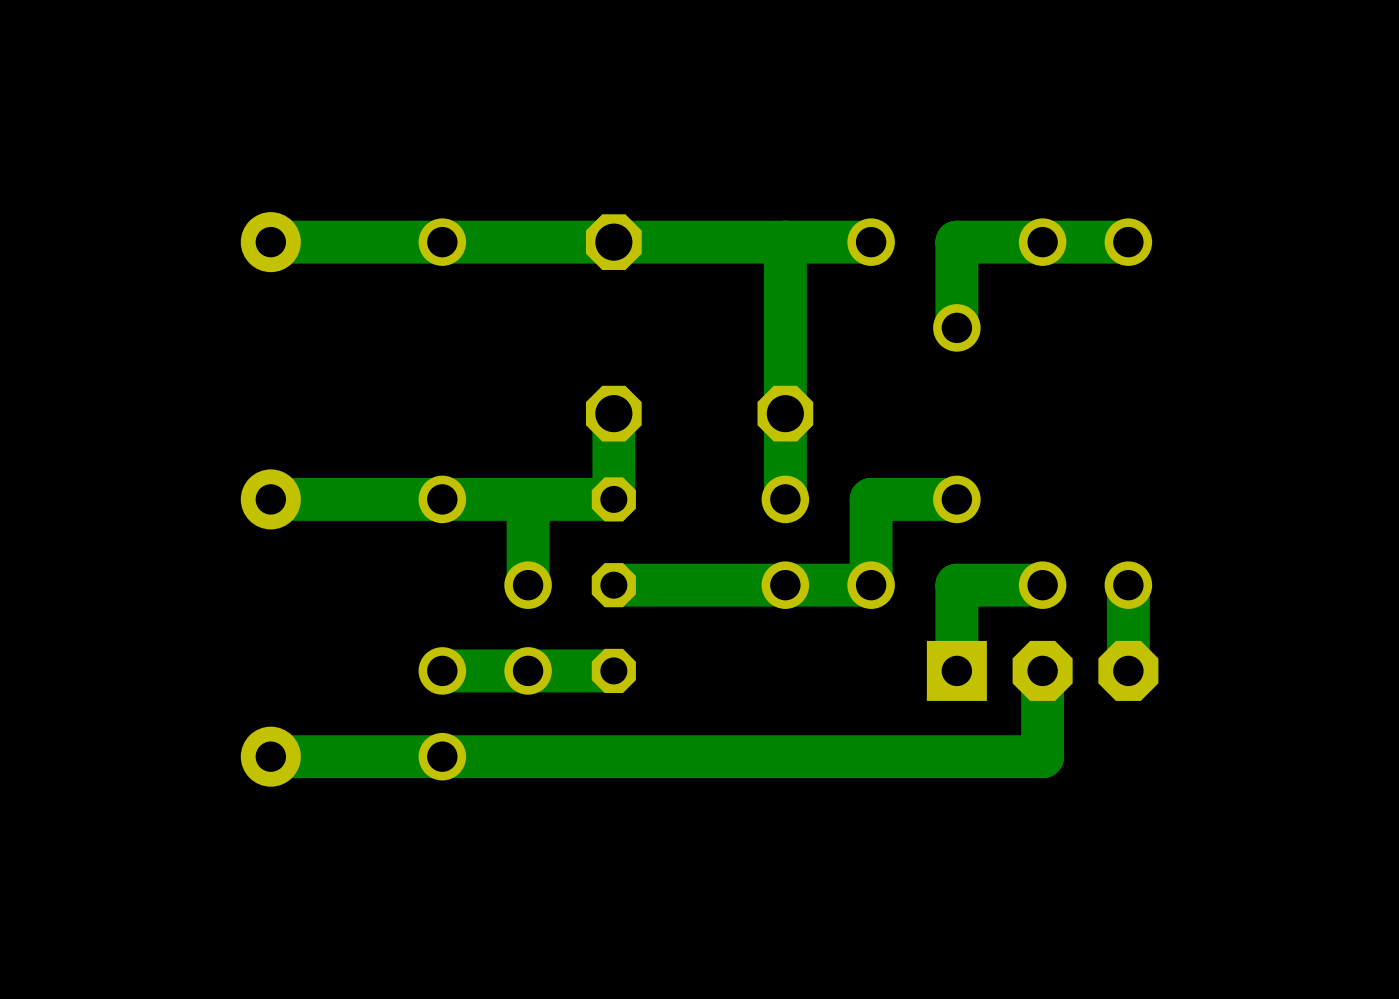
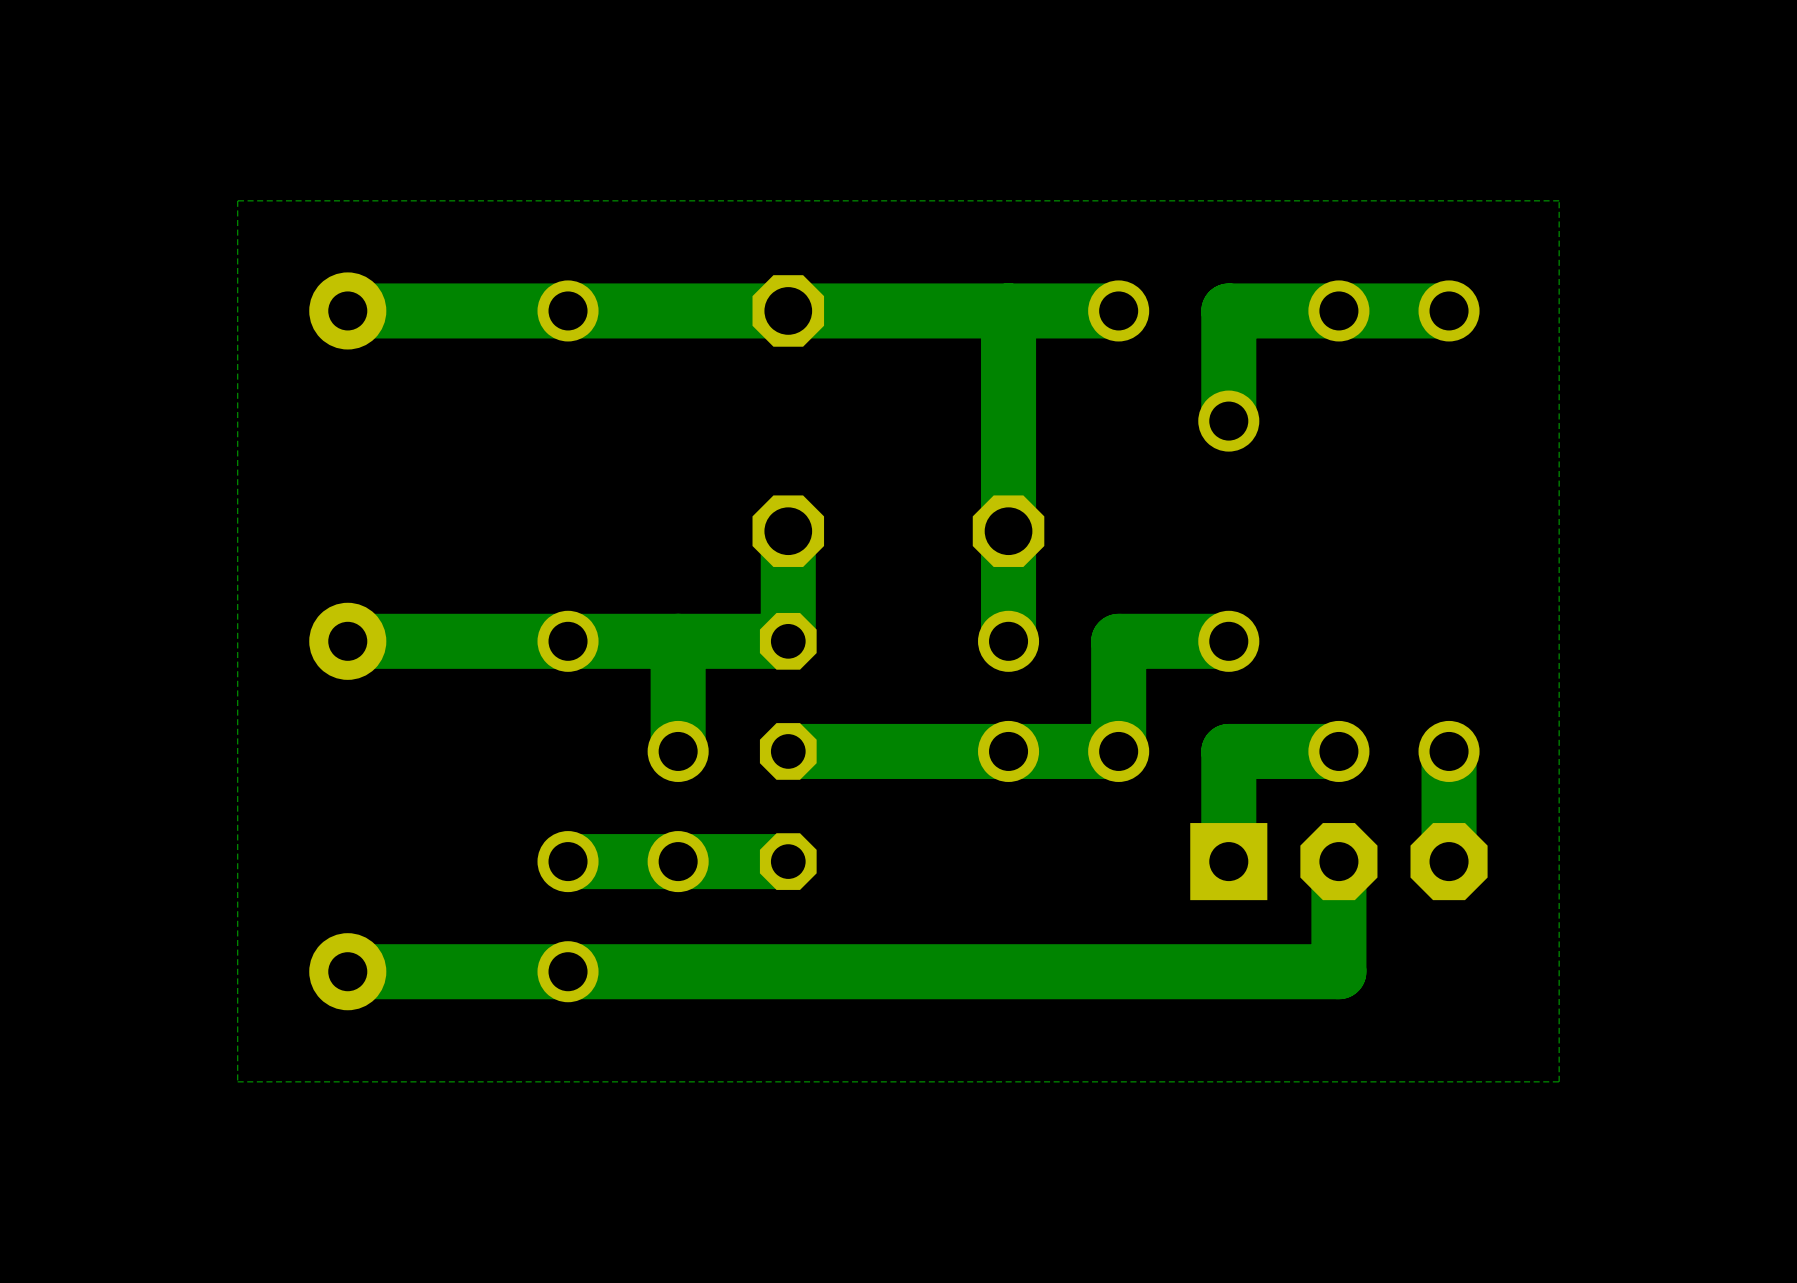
zone outline: none -> (1559, 200) (1559, 1081) (237, 1081) (237, 200) (1559, 200)

